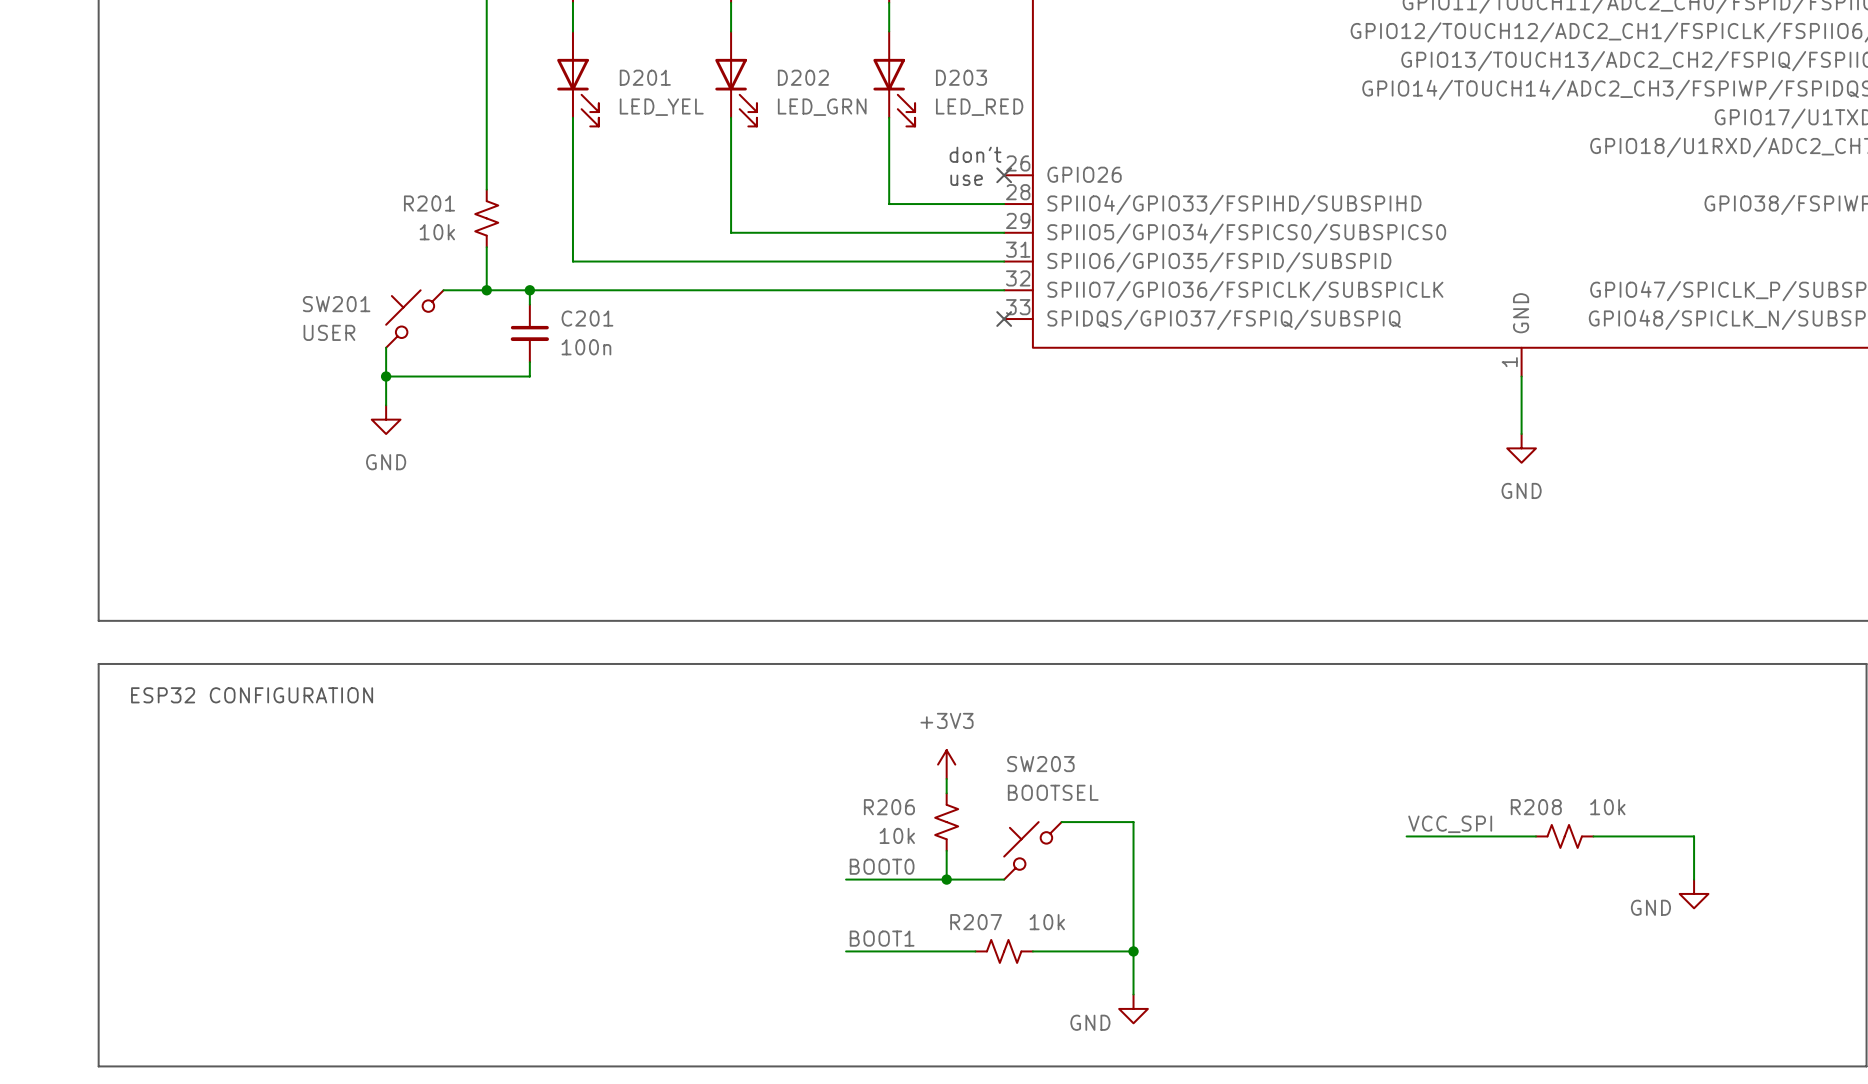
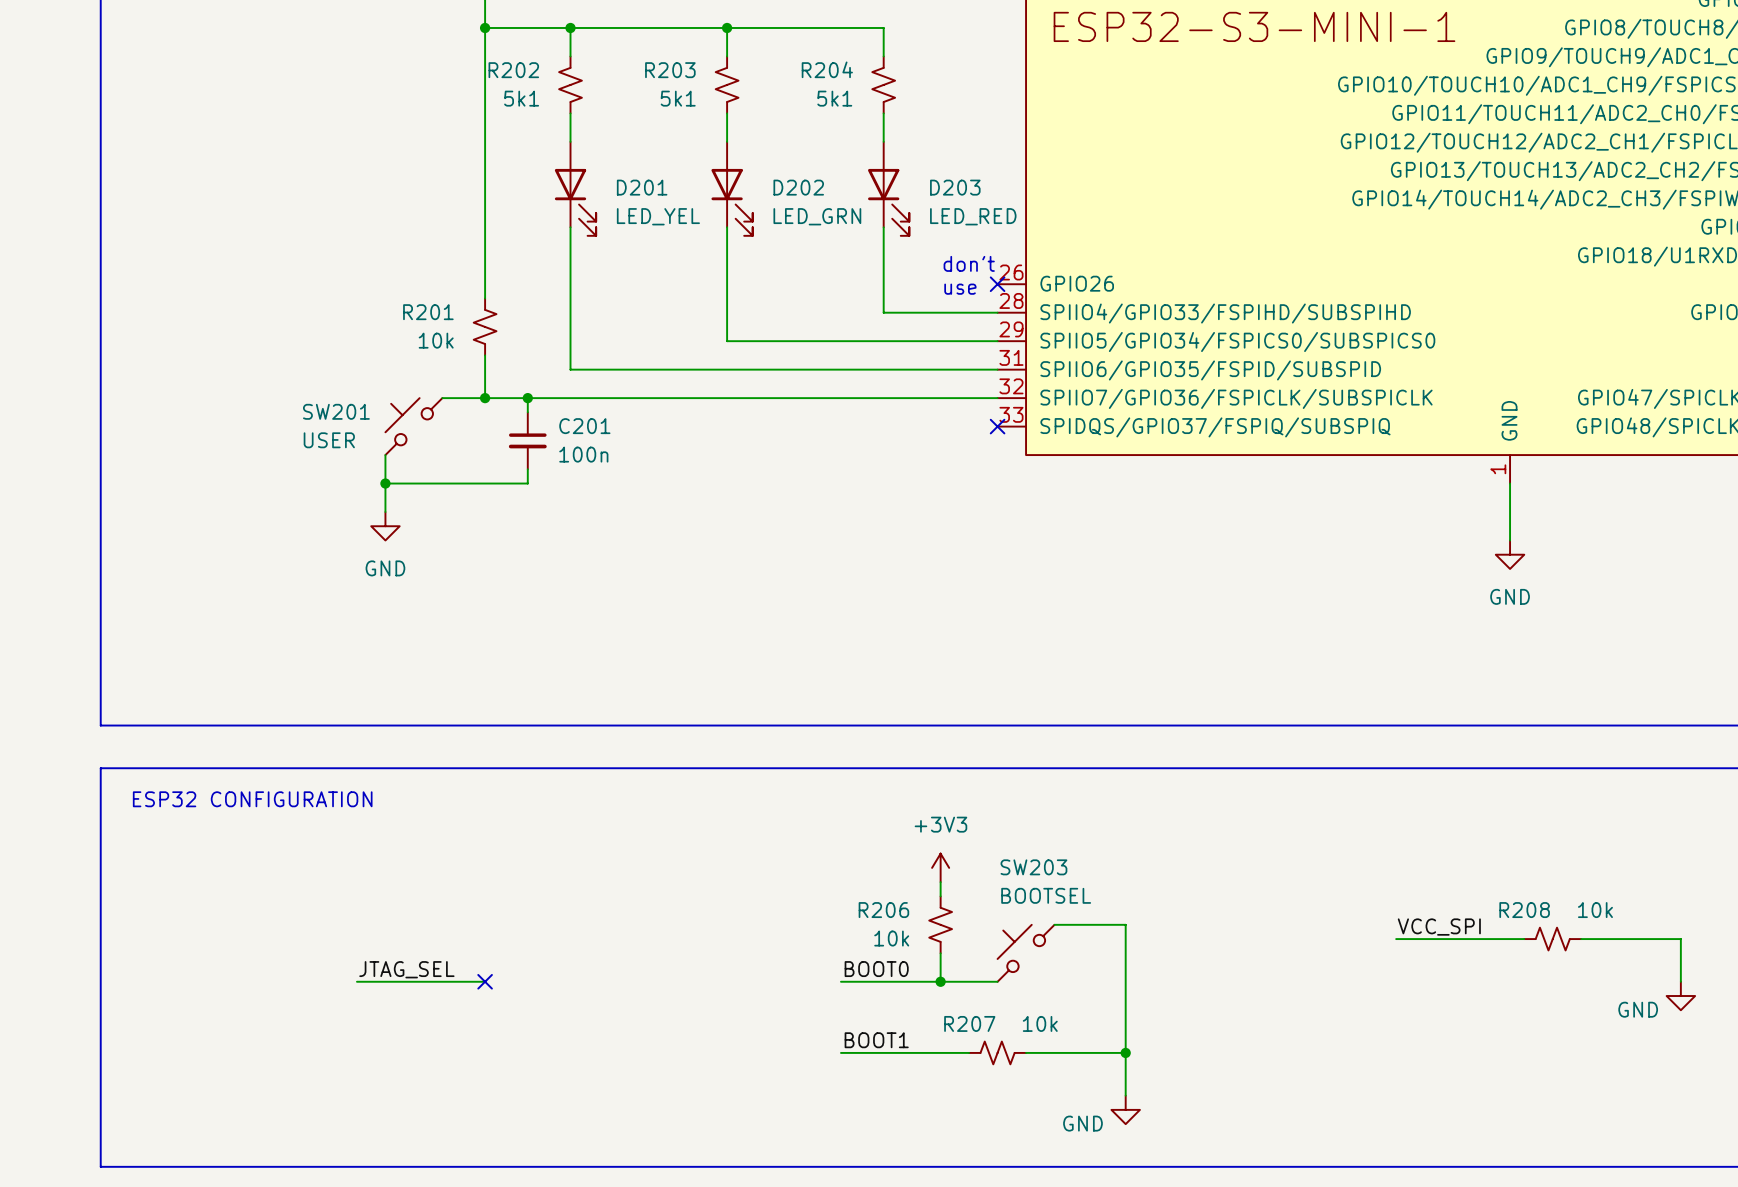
label: none -> JTAG_SEL (406, 969)
wire: none -> (356, 981) (485, 981)
no-connect mark: none -> (485, 981)

